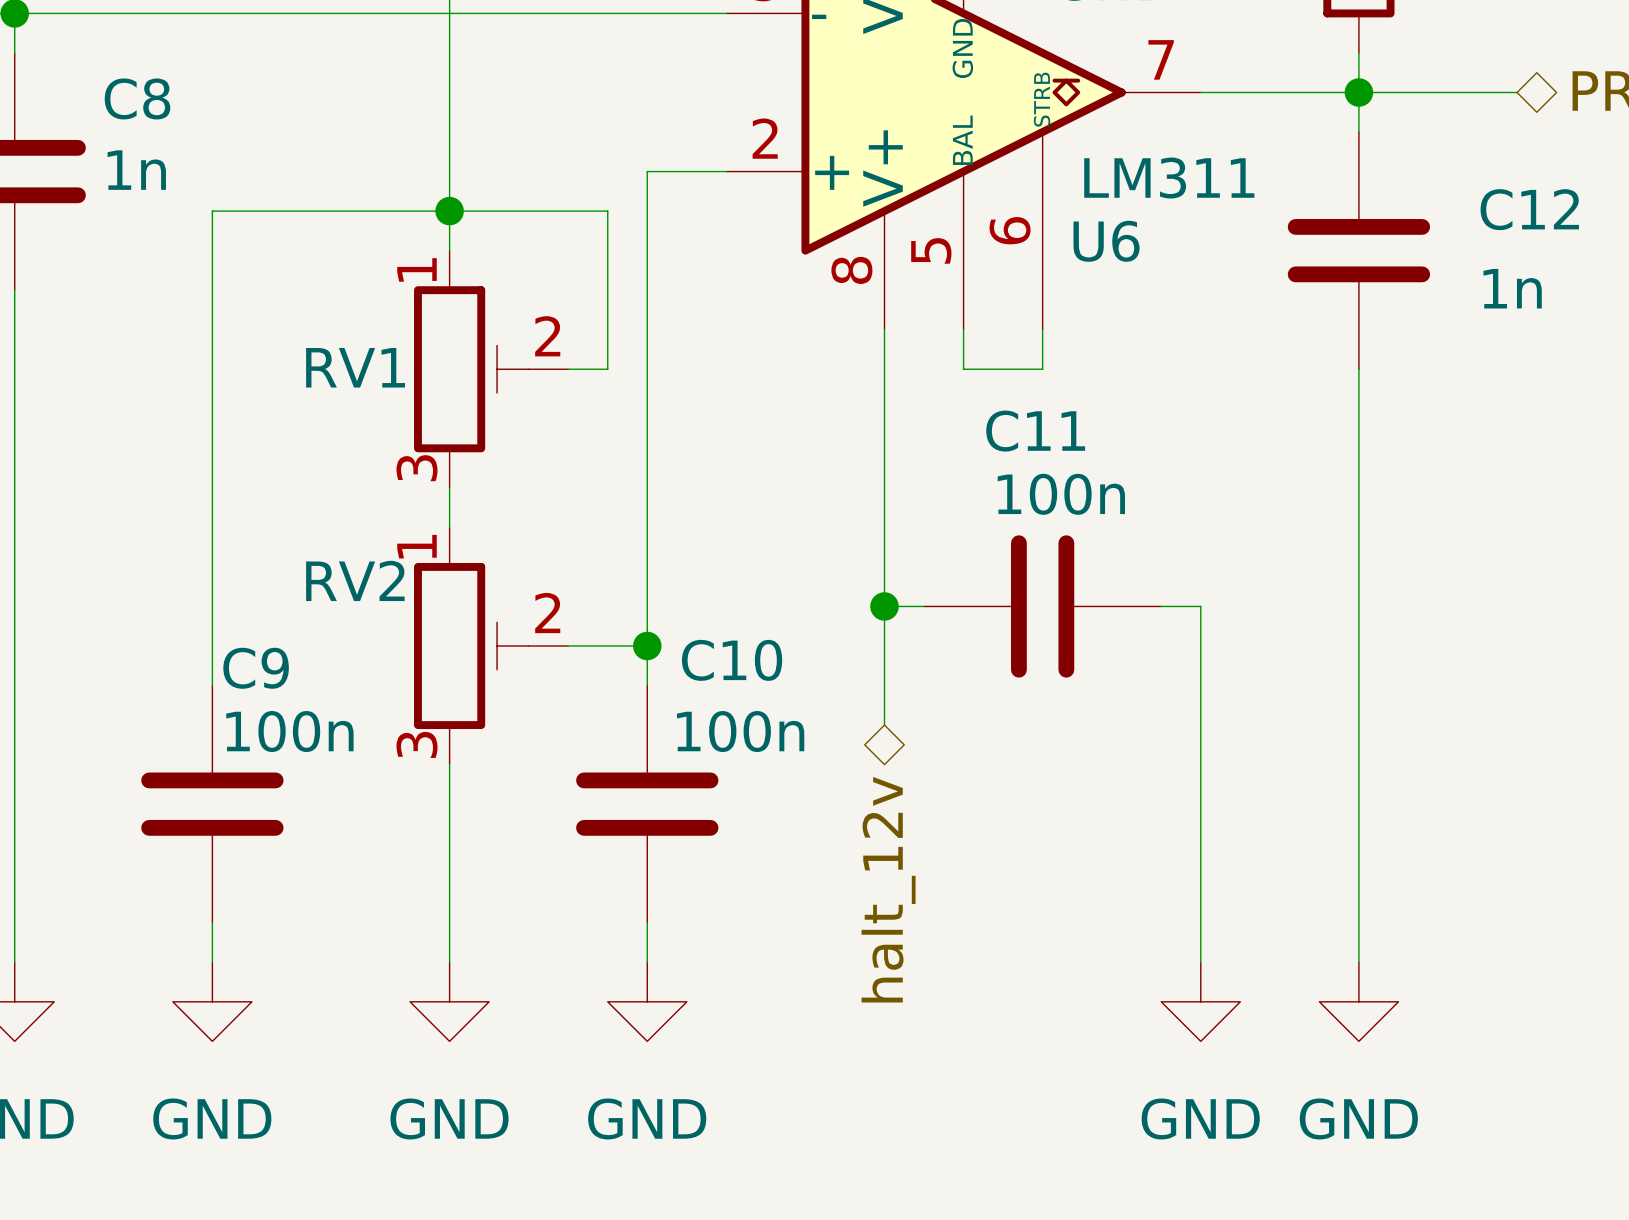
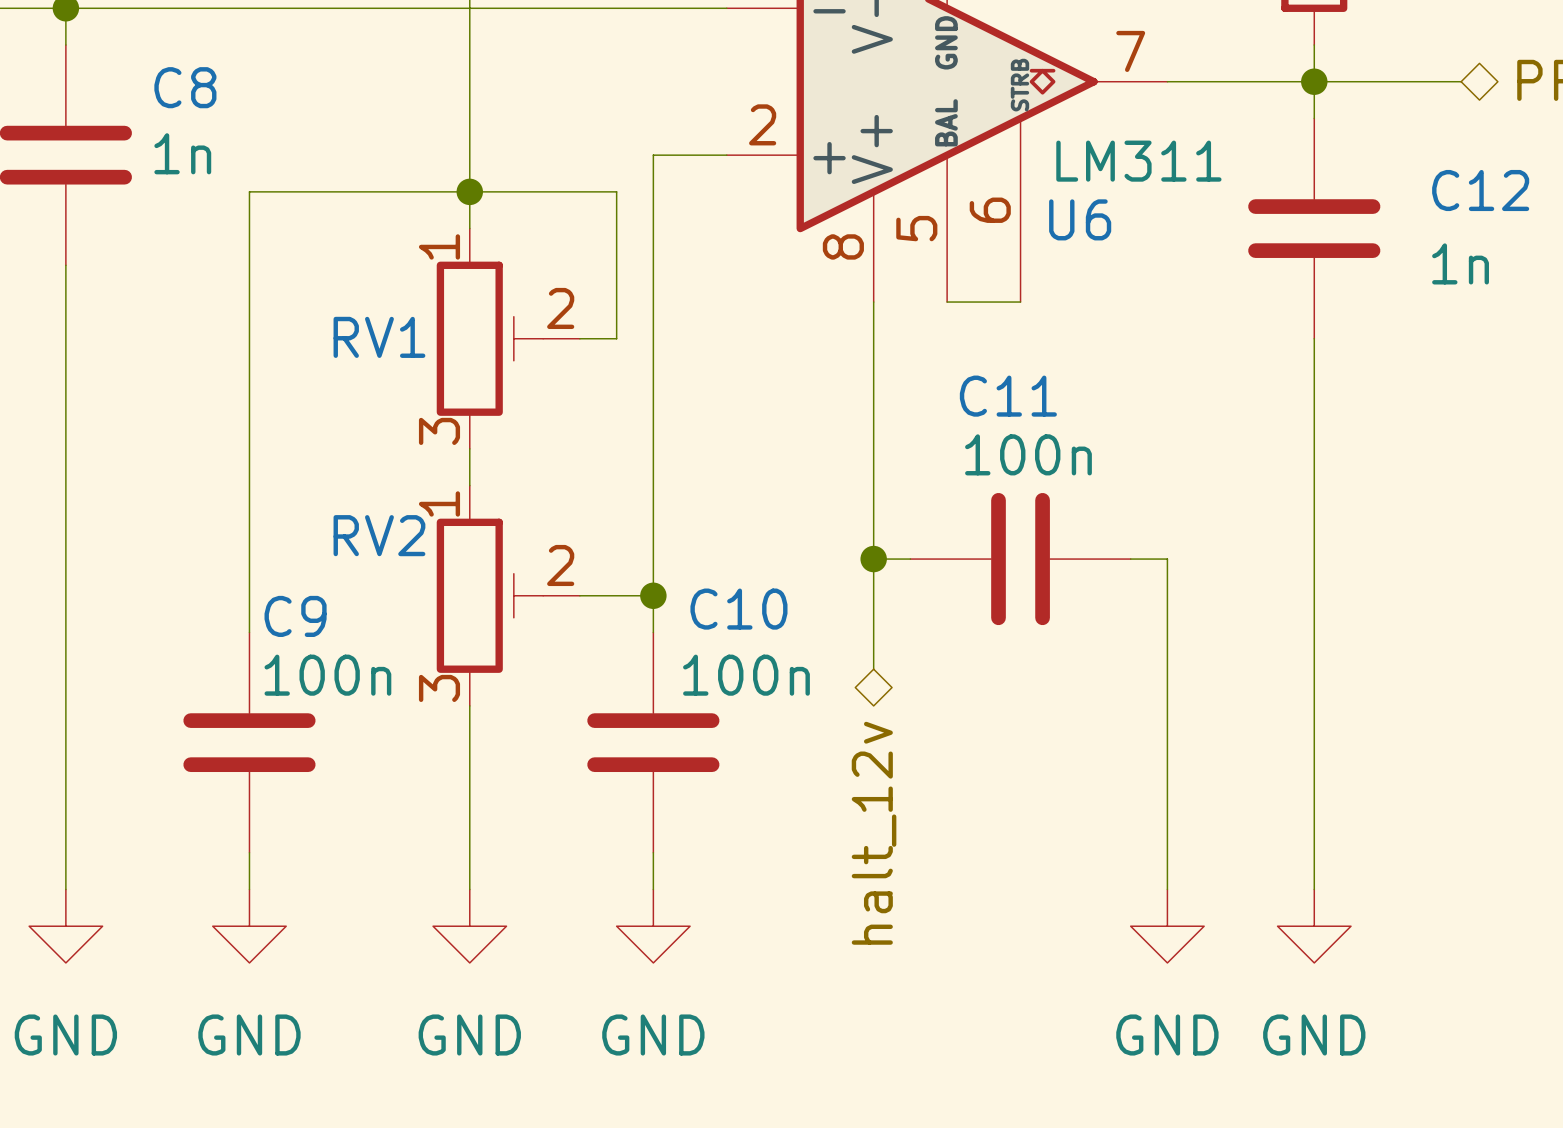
wire: (963, 329) (963, 369) (1042, 369) (1042, 329) -> (947, 302) (1020, 302)

